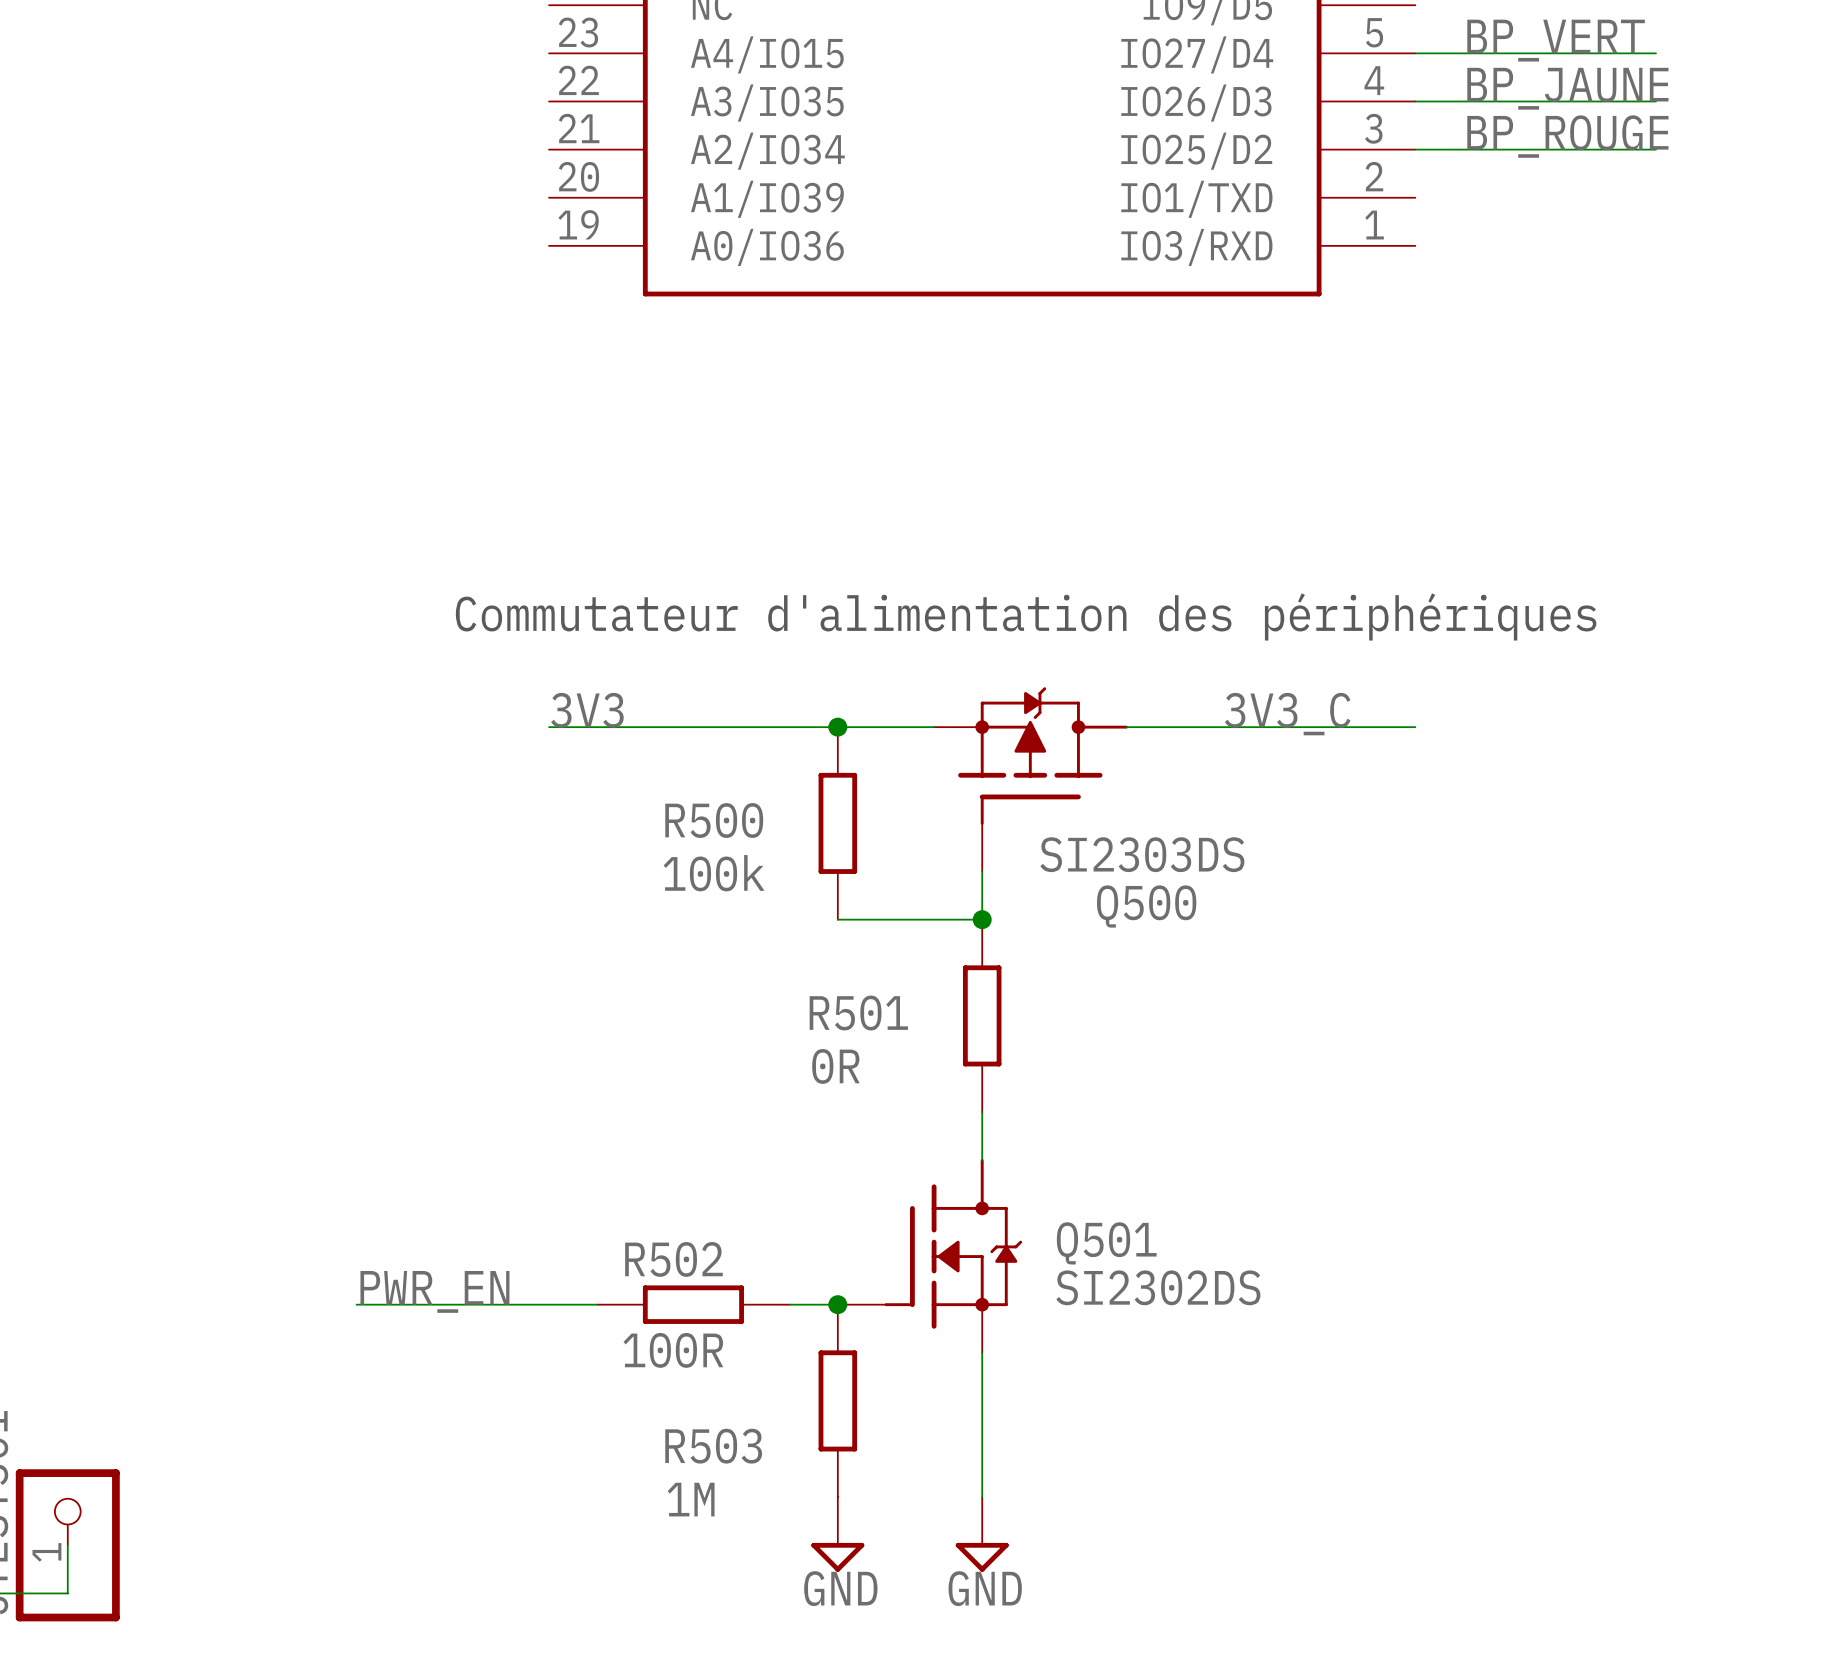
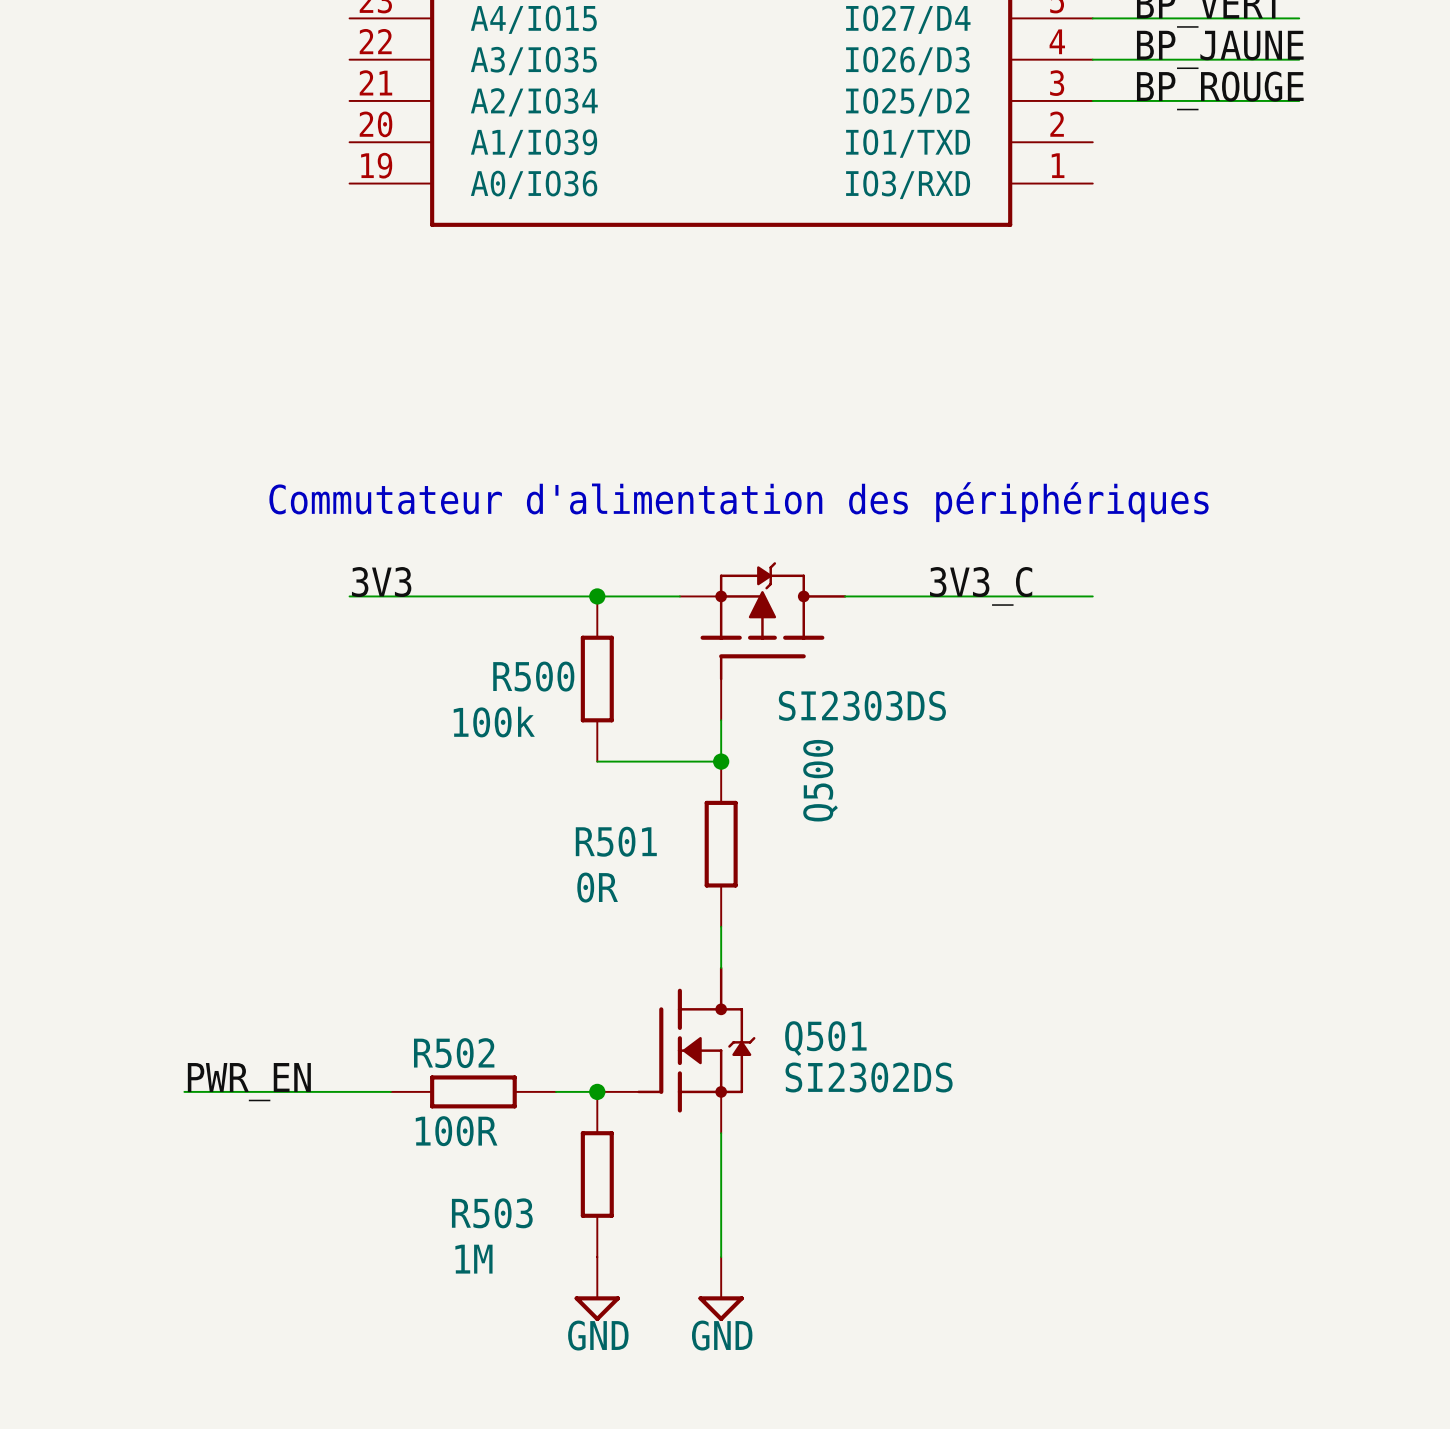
R500 name position: R500 (714, 820) -> R500 (533, 676)
Q500 name rotation: 0° (1146, 906) -> 90° counterclockwise (820, 780)

